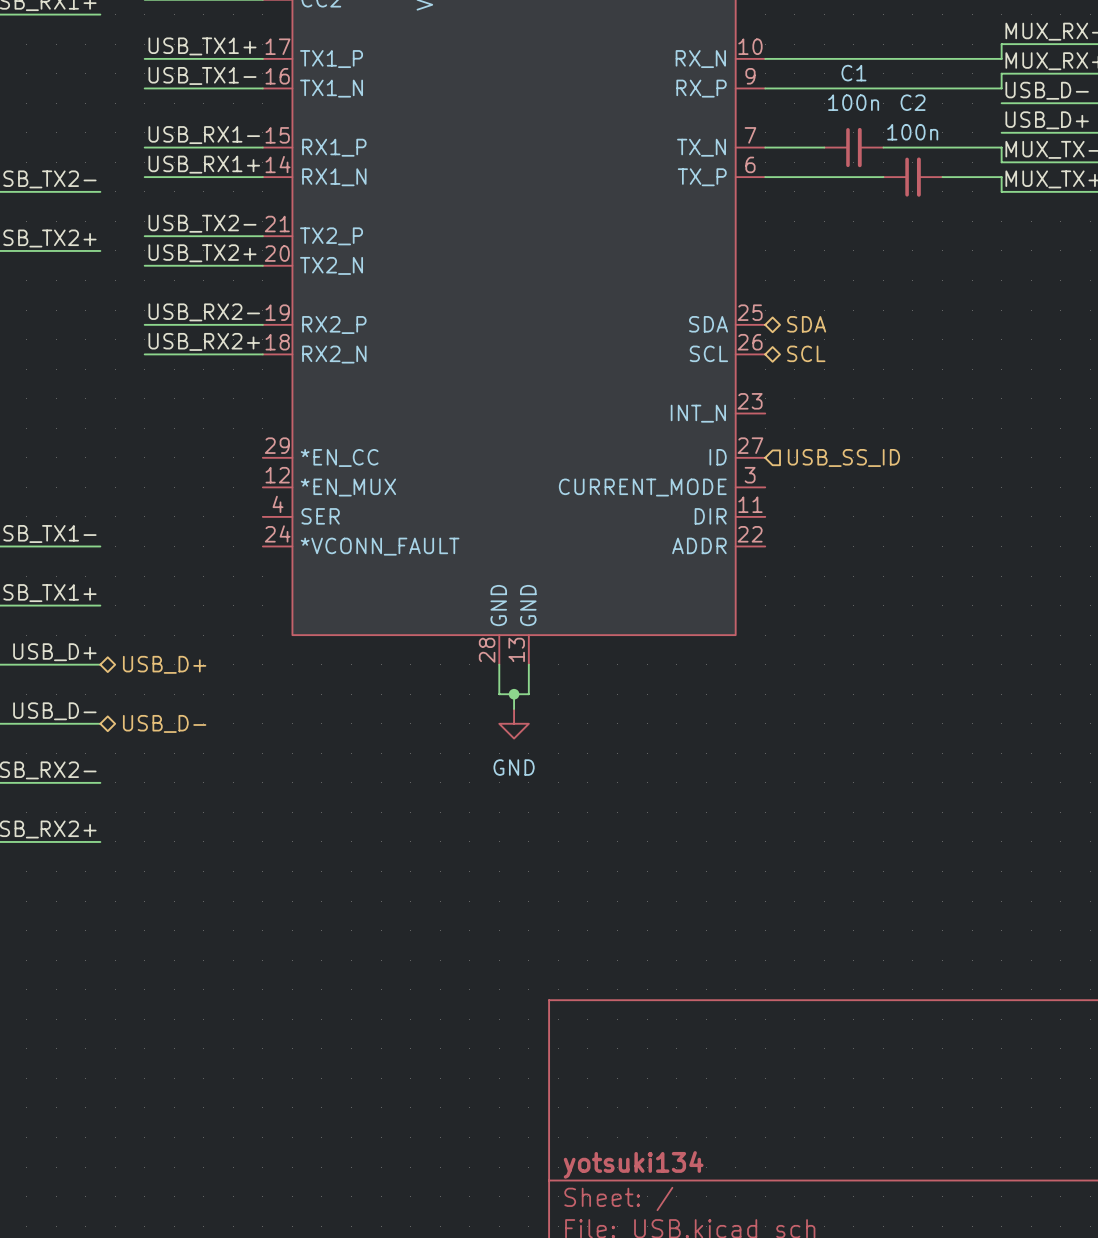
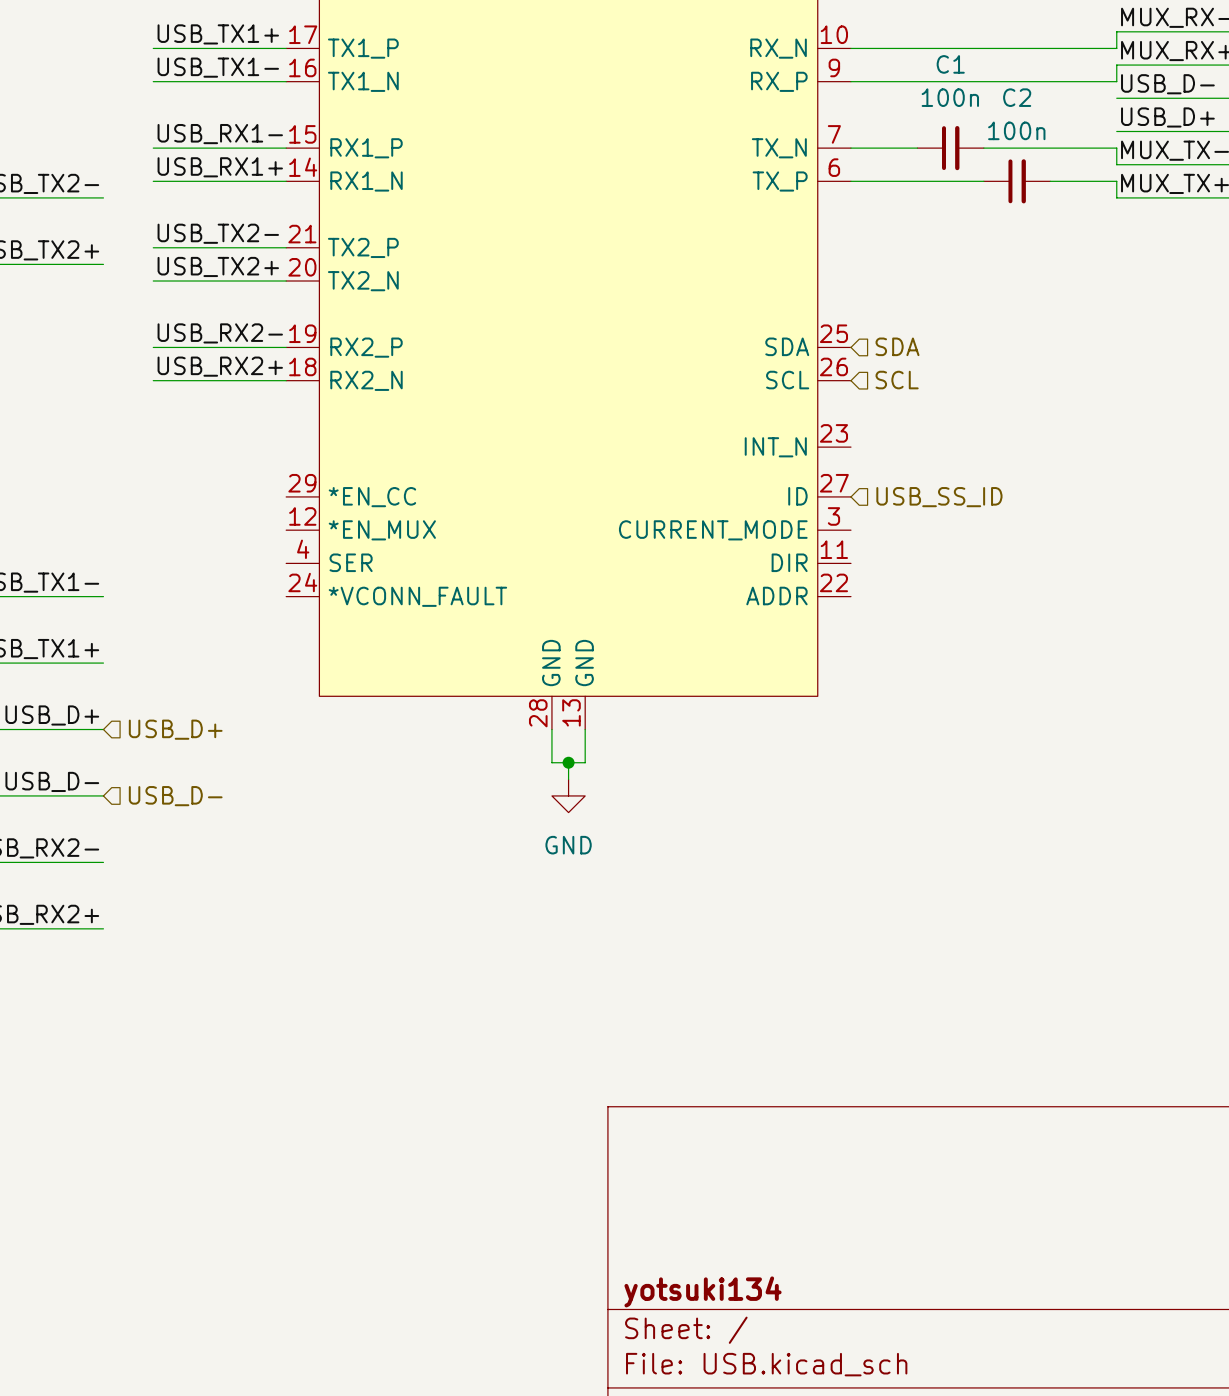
hierarchical label shape: bidirectional (806, 324) -> input (897, 346)
hierarchical label shape: bidirectional (806, 353) -> input (897, 380)
hierarchical label shape: bidirectional (164, 664) -> input (175, 729)
hierarchical label shape: bidirectional (164, 723) -> input (175, 796)

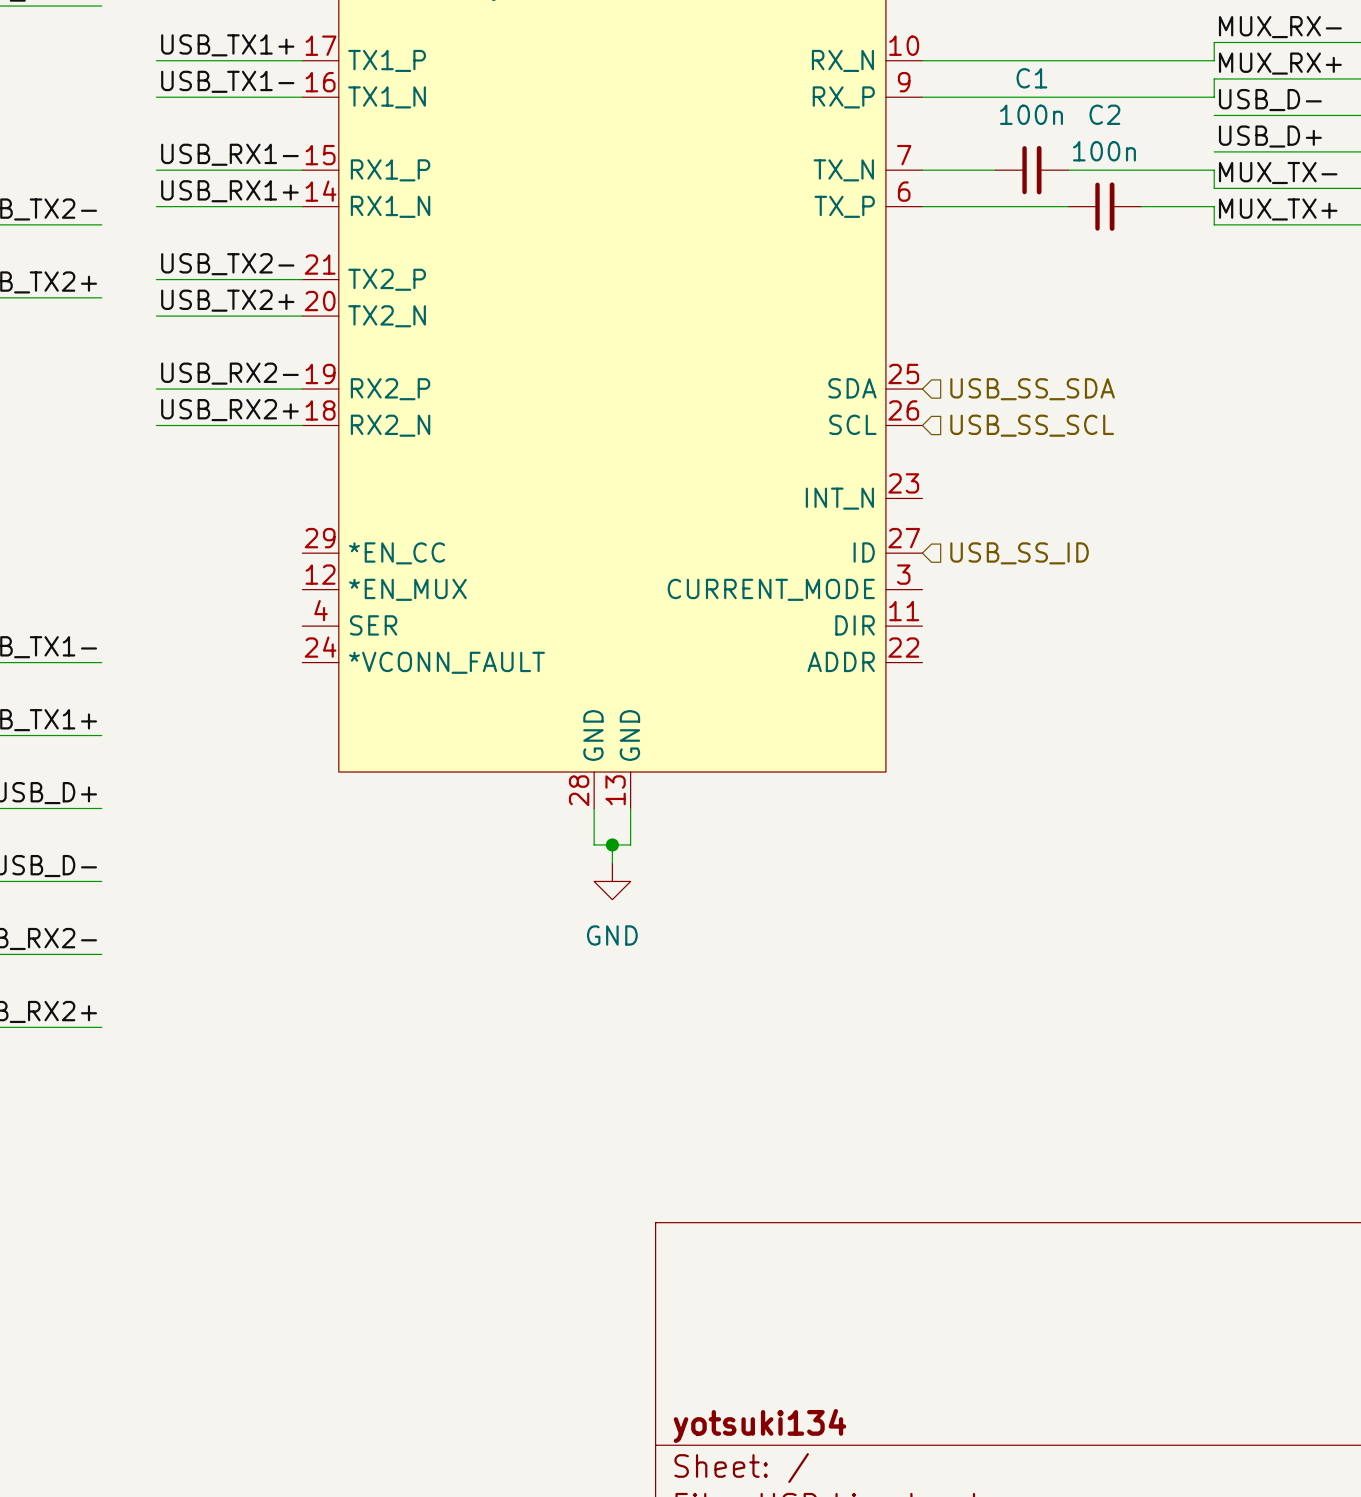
hierarchical label: SDA (897, 346) -> USB_SS_SDA (1032, 389)
hierarchical label: SCL (897, 380) -> USB_SS_SCL (1032, 425)
hierarchical label: USB_D+ (175, 729) -> none
hierarchical label: USB_D- (175, 796) -> none

